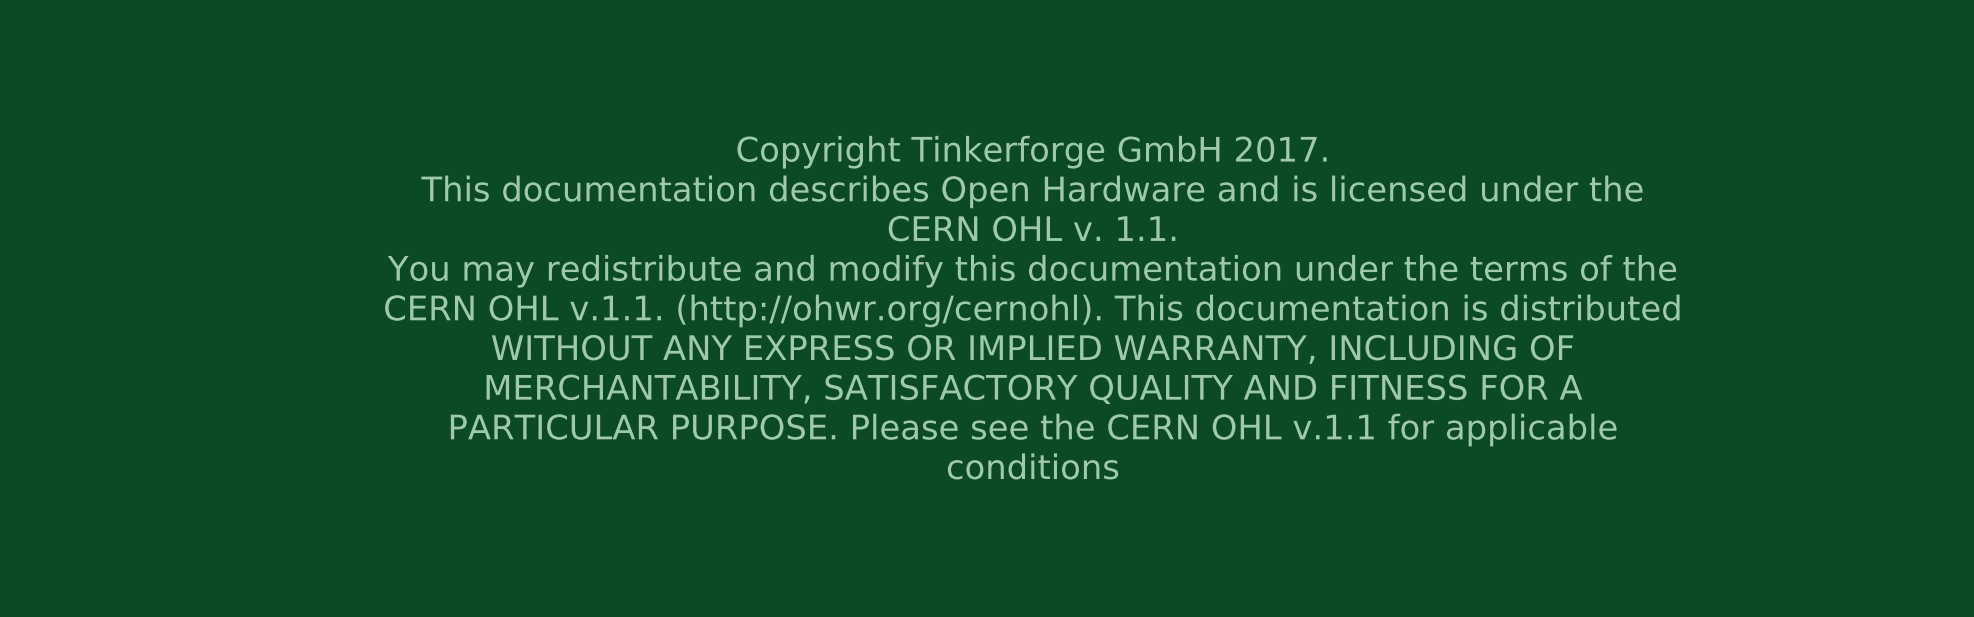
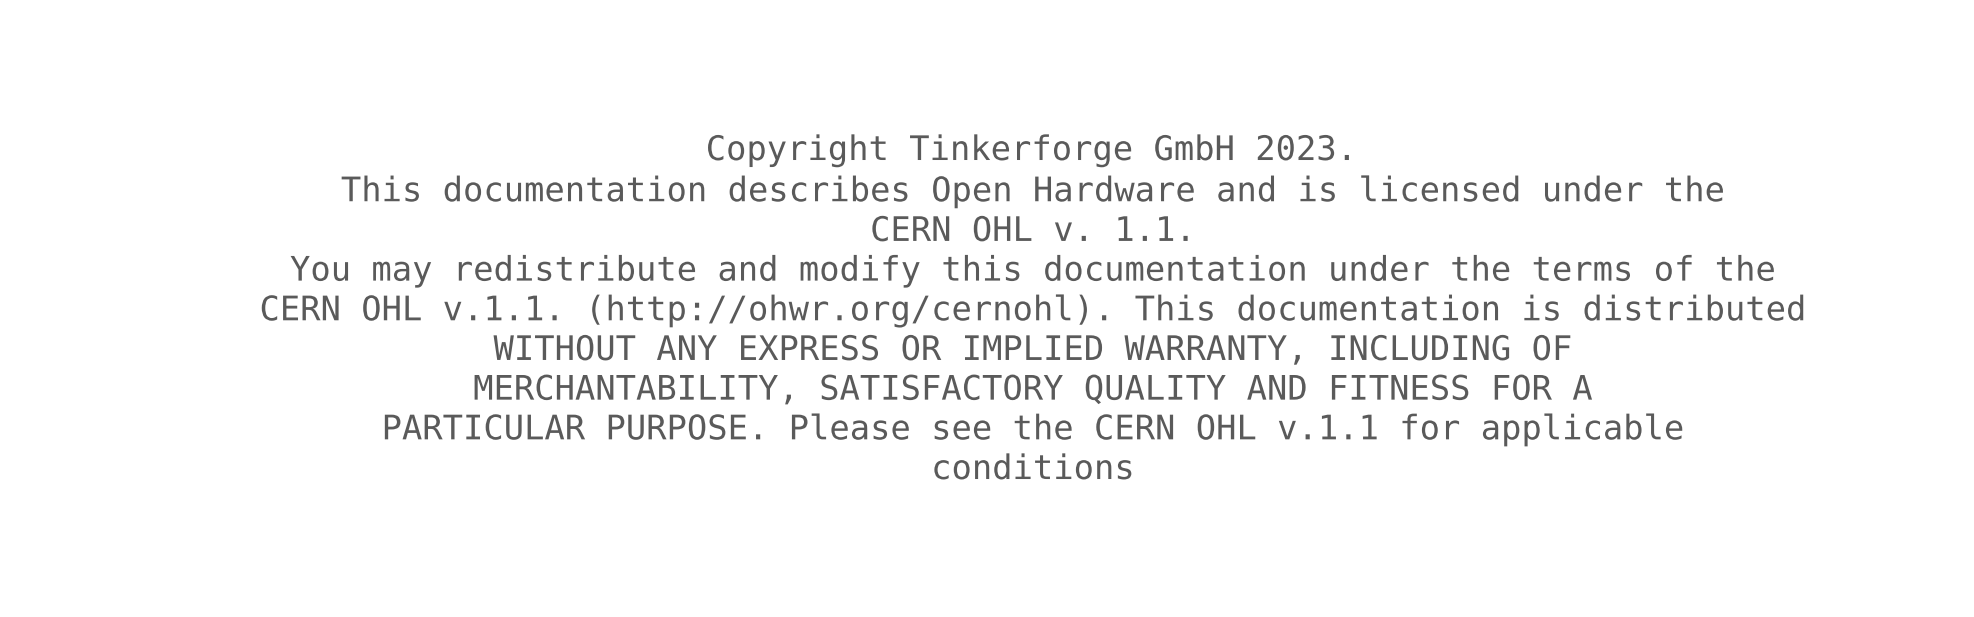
text: Copyright Tinkerforge GmbH 2017. (1032, 152) -> Copyright Tinkerforge GmbH 2023. (1028, 150)

